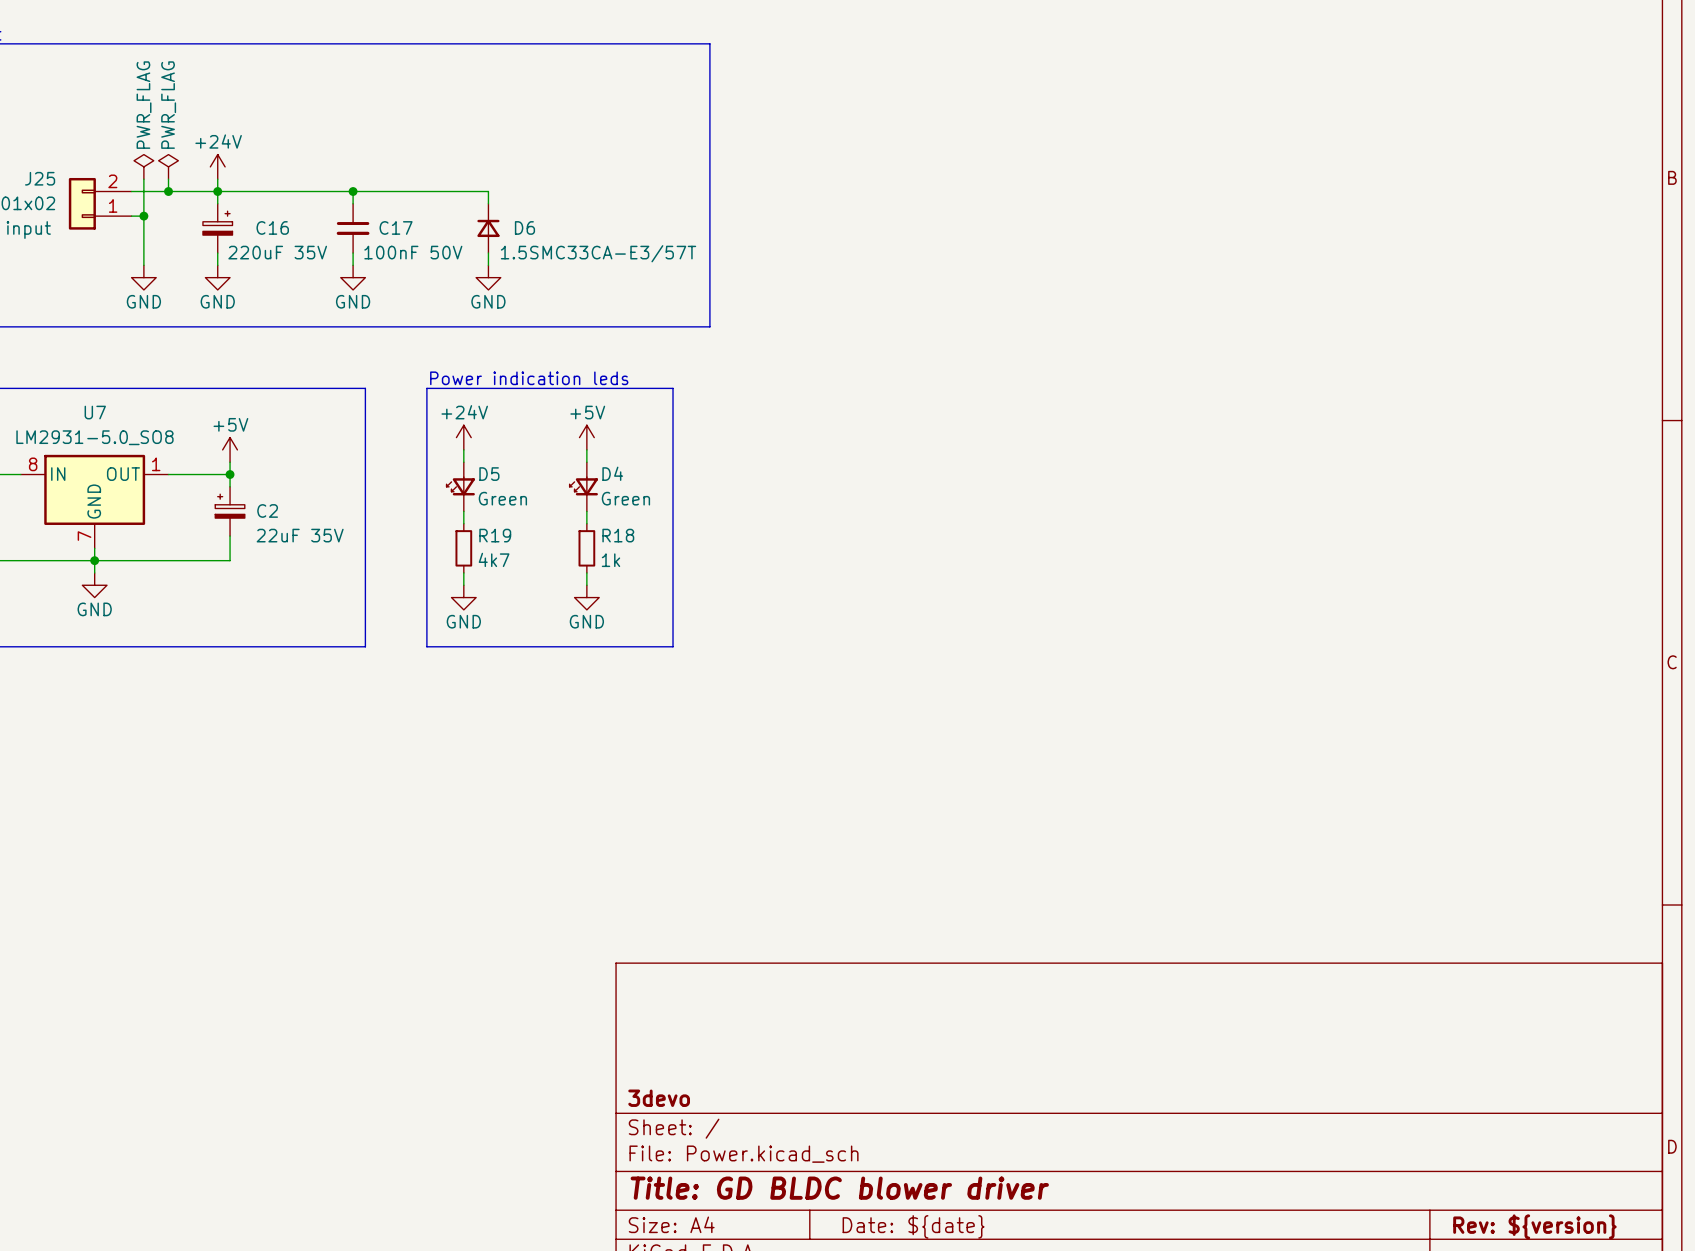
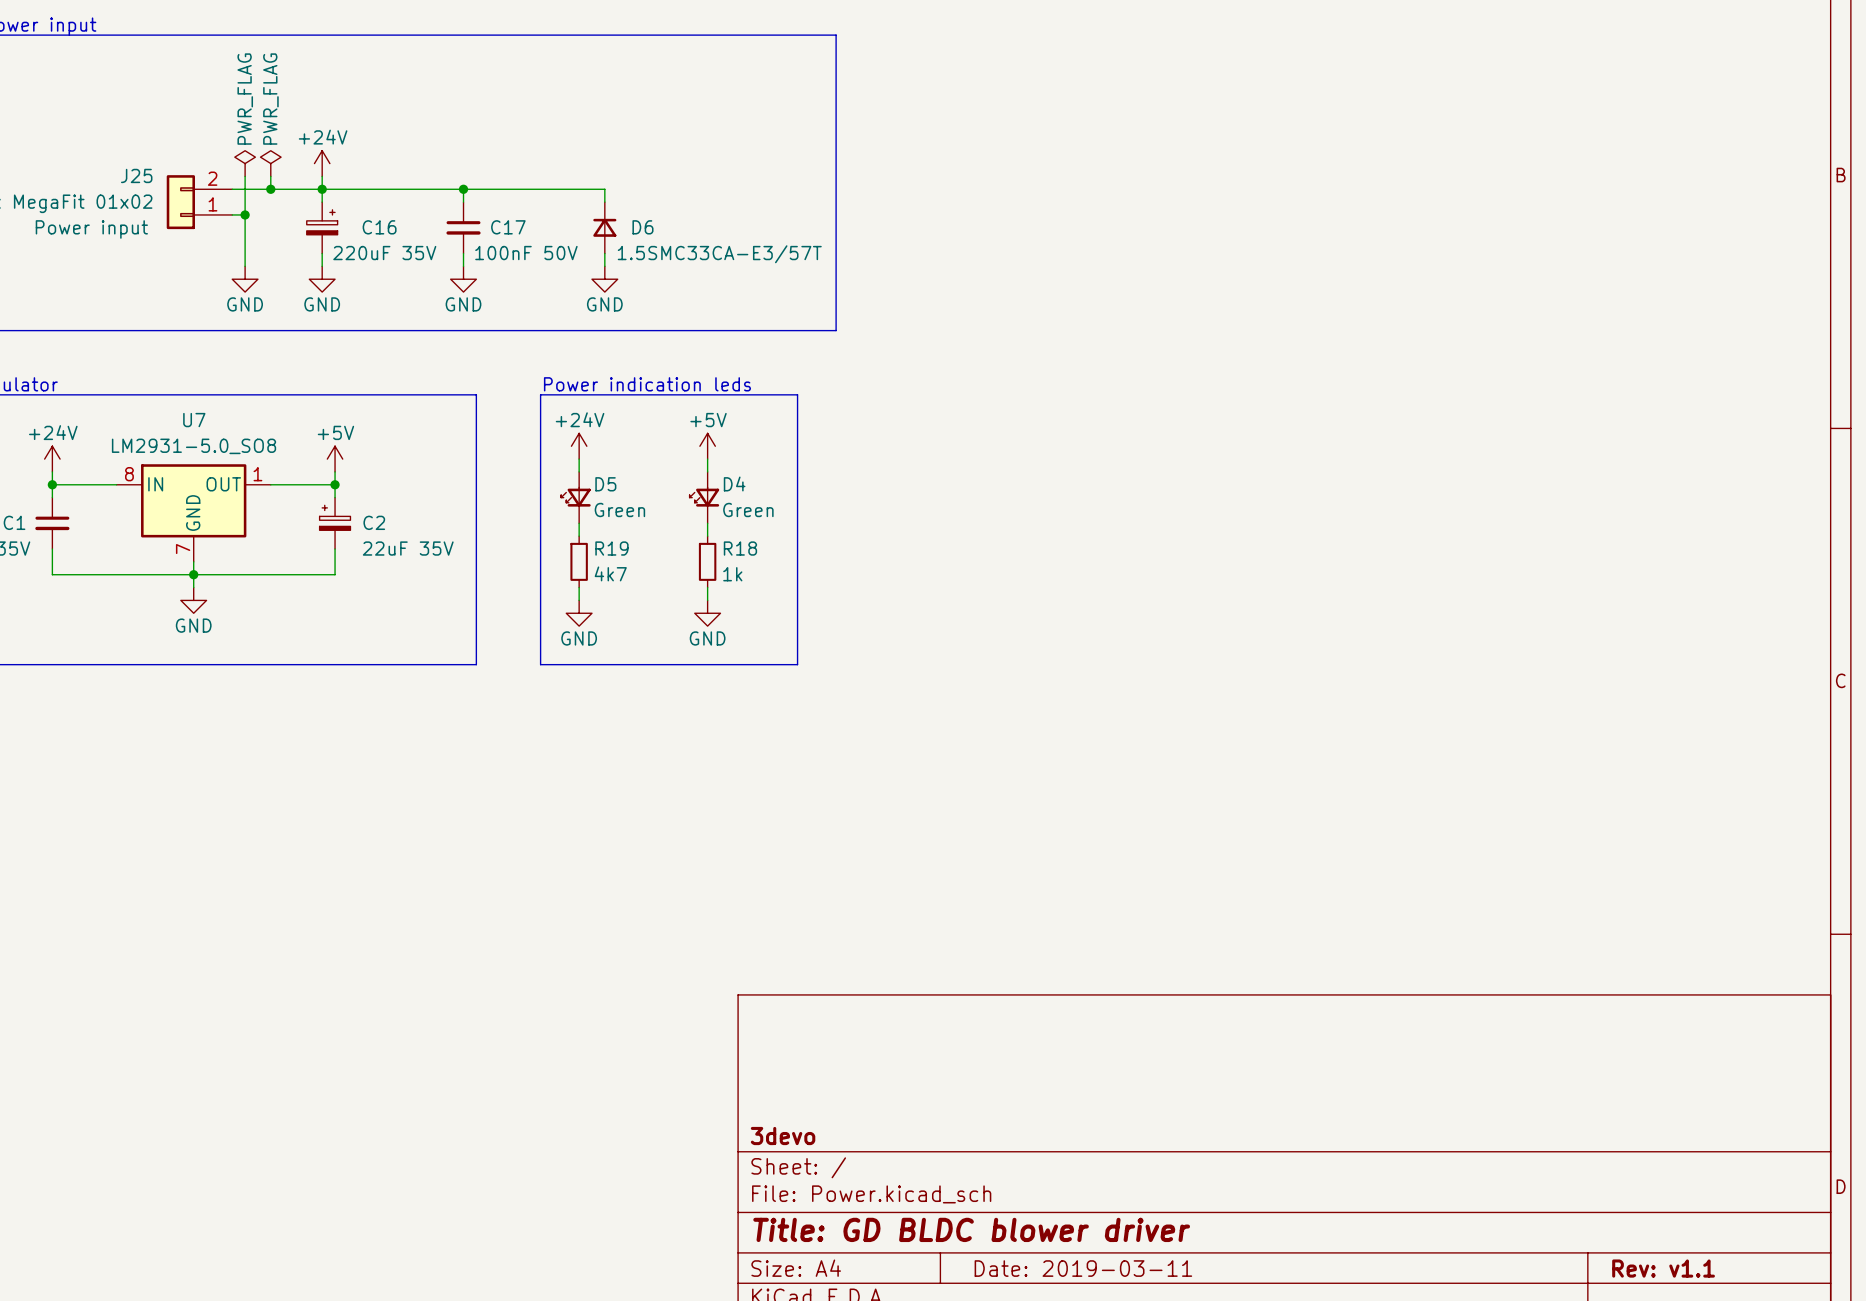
title block: Date: ${date} (913, 1226) -> Date: 2019-03-11 (1083, 1268)
title block: Rev: ${version} (1534, 1226) -> Rev: v1.1 (1663, 1268)

